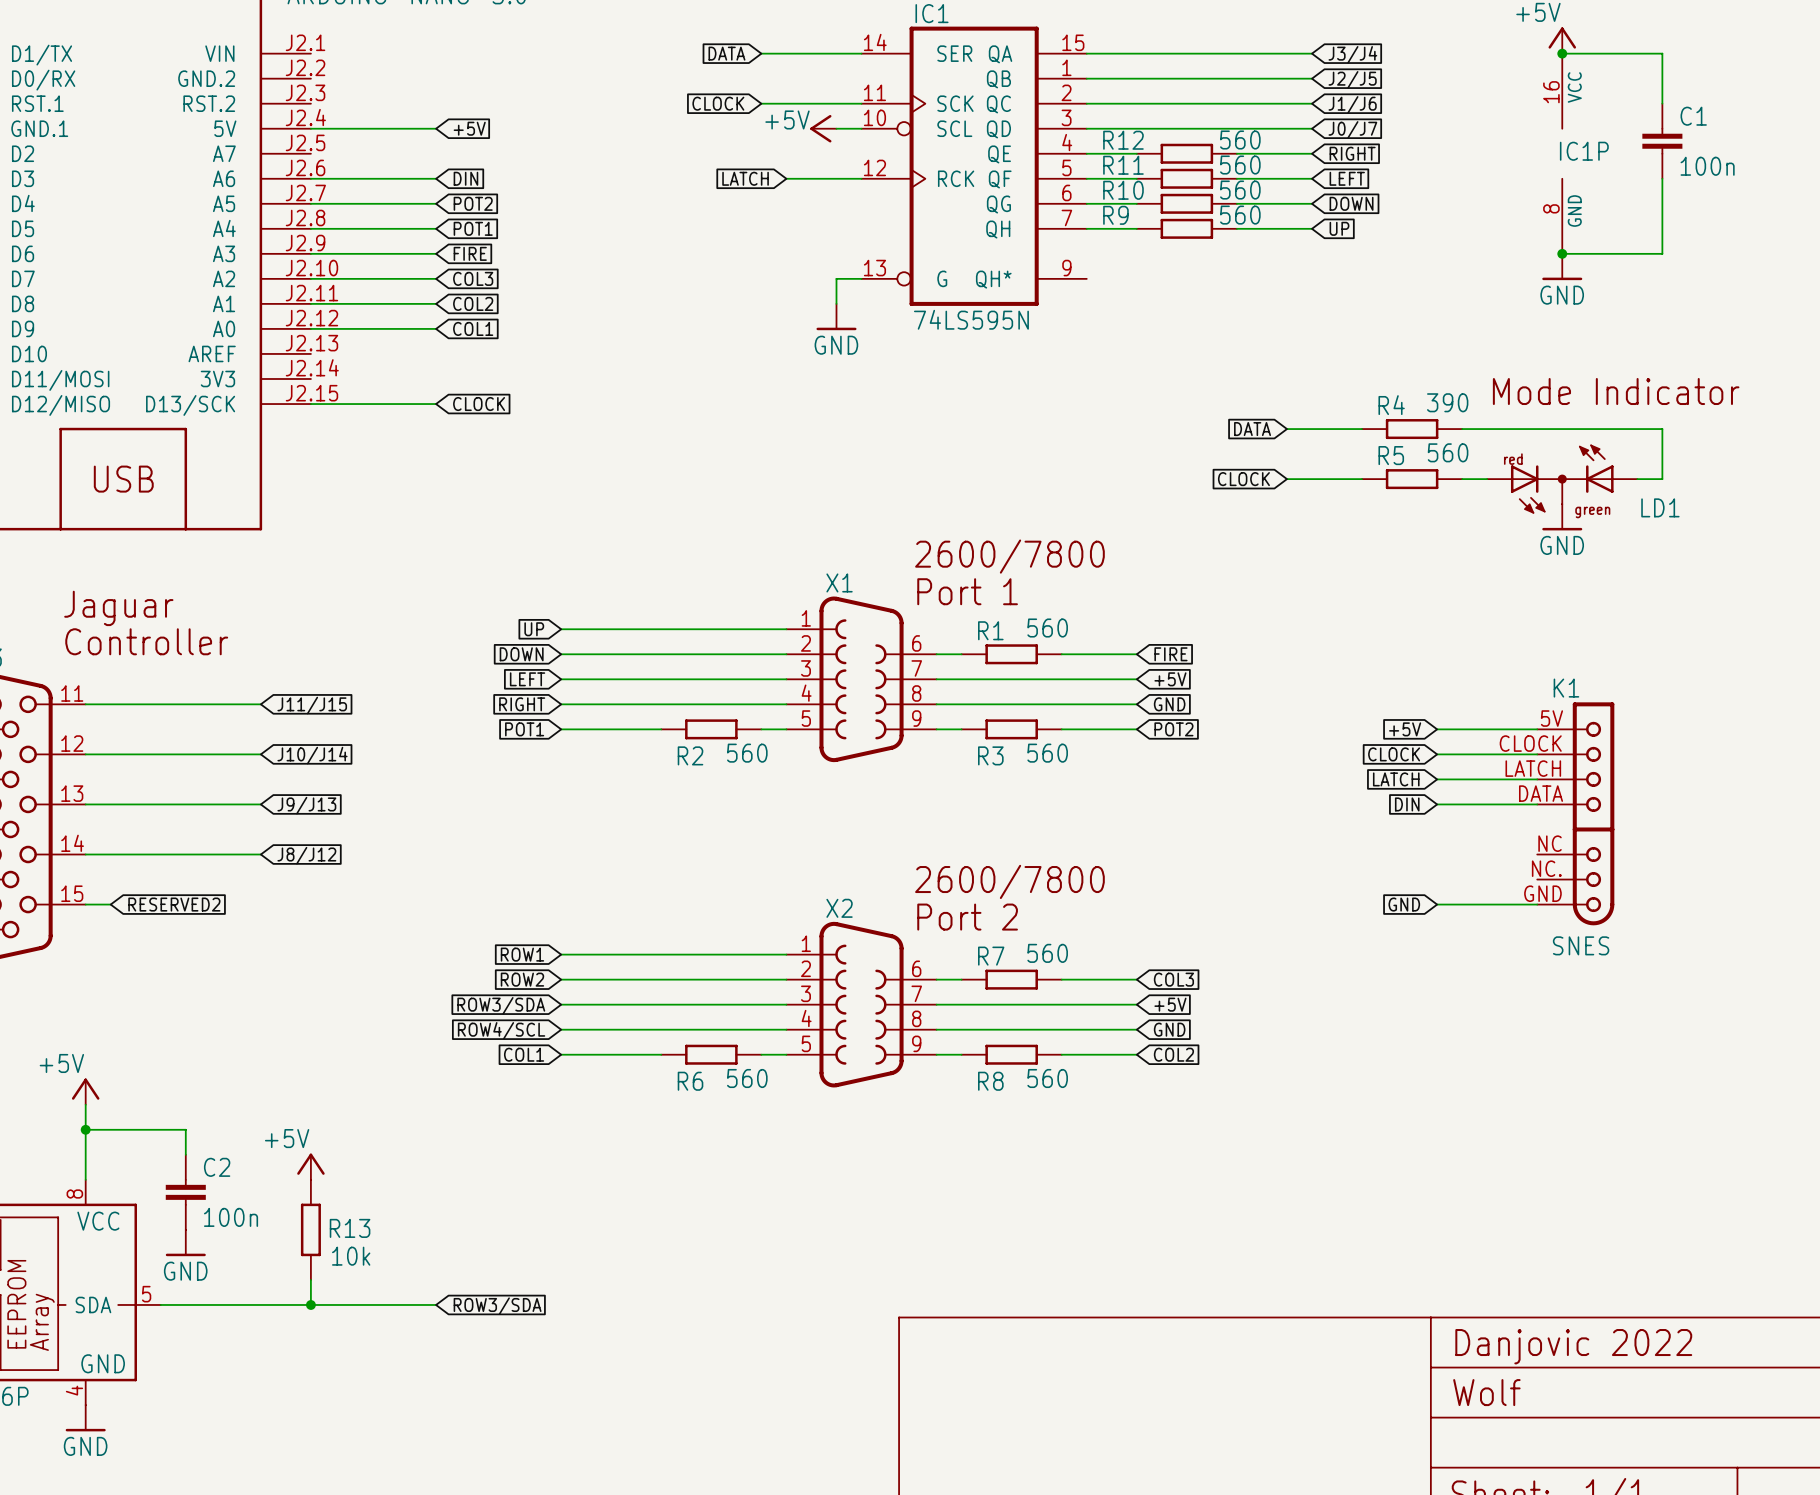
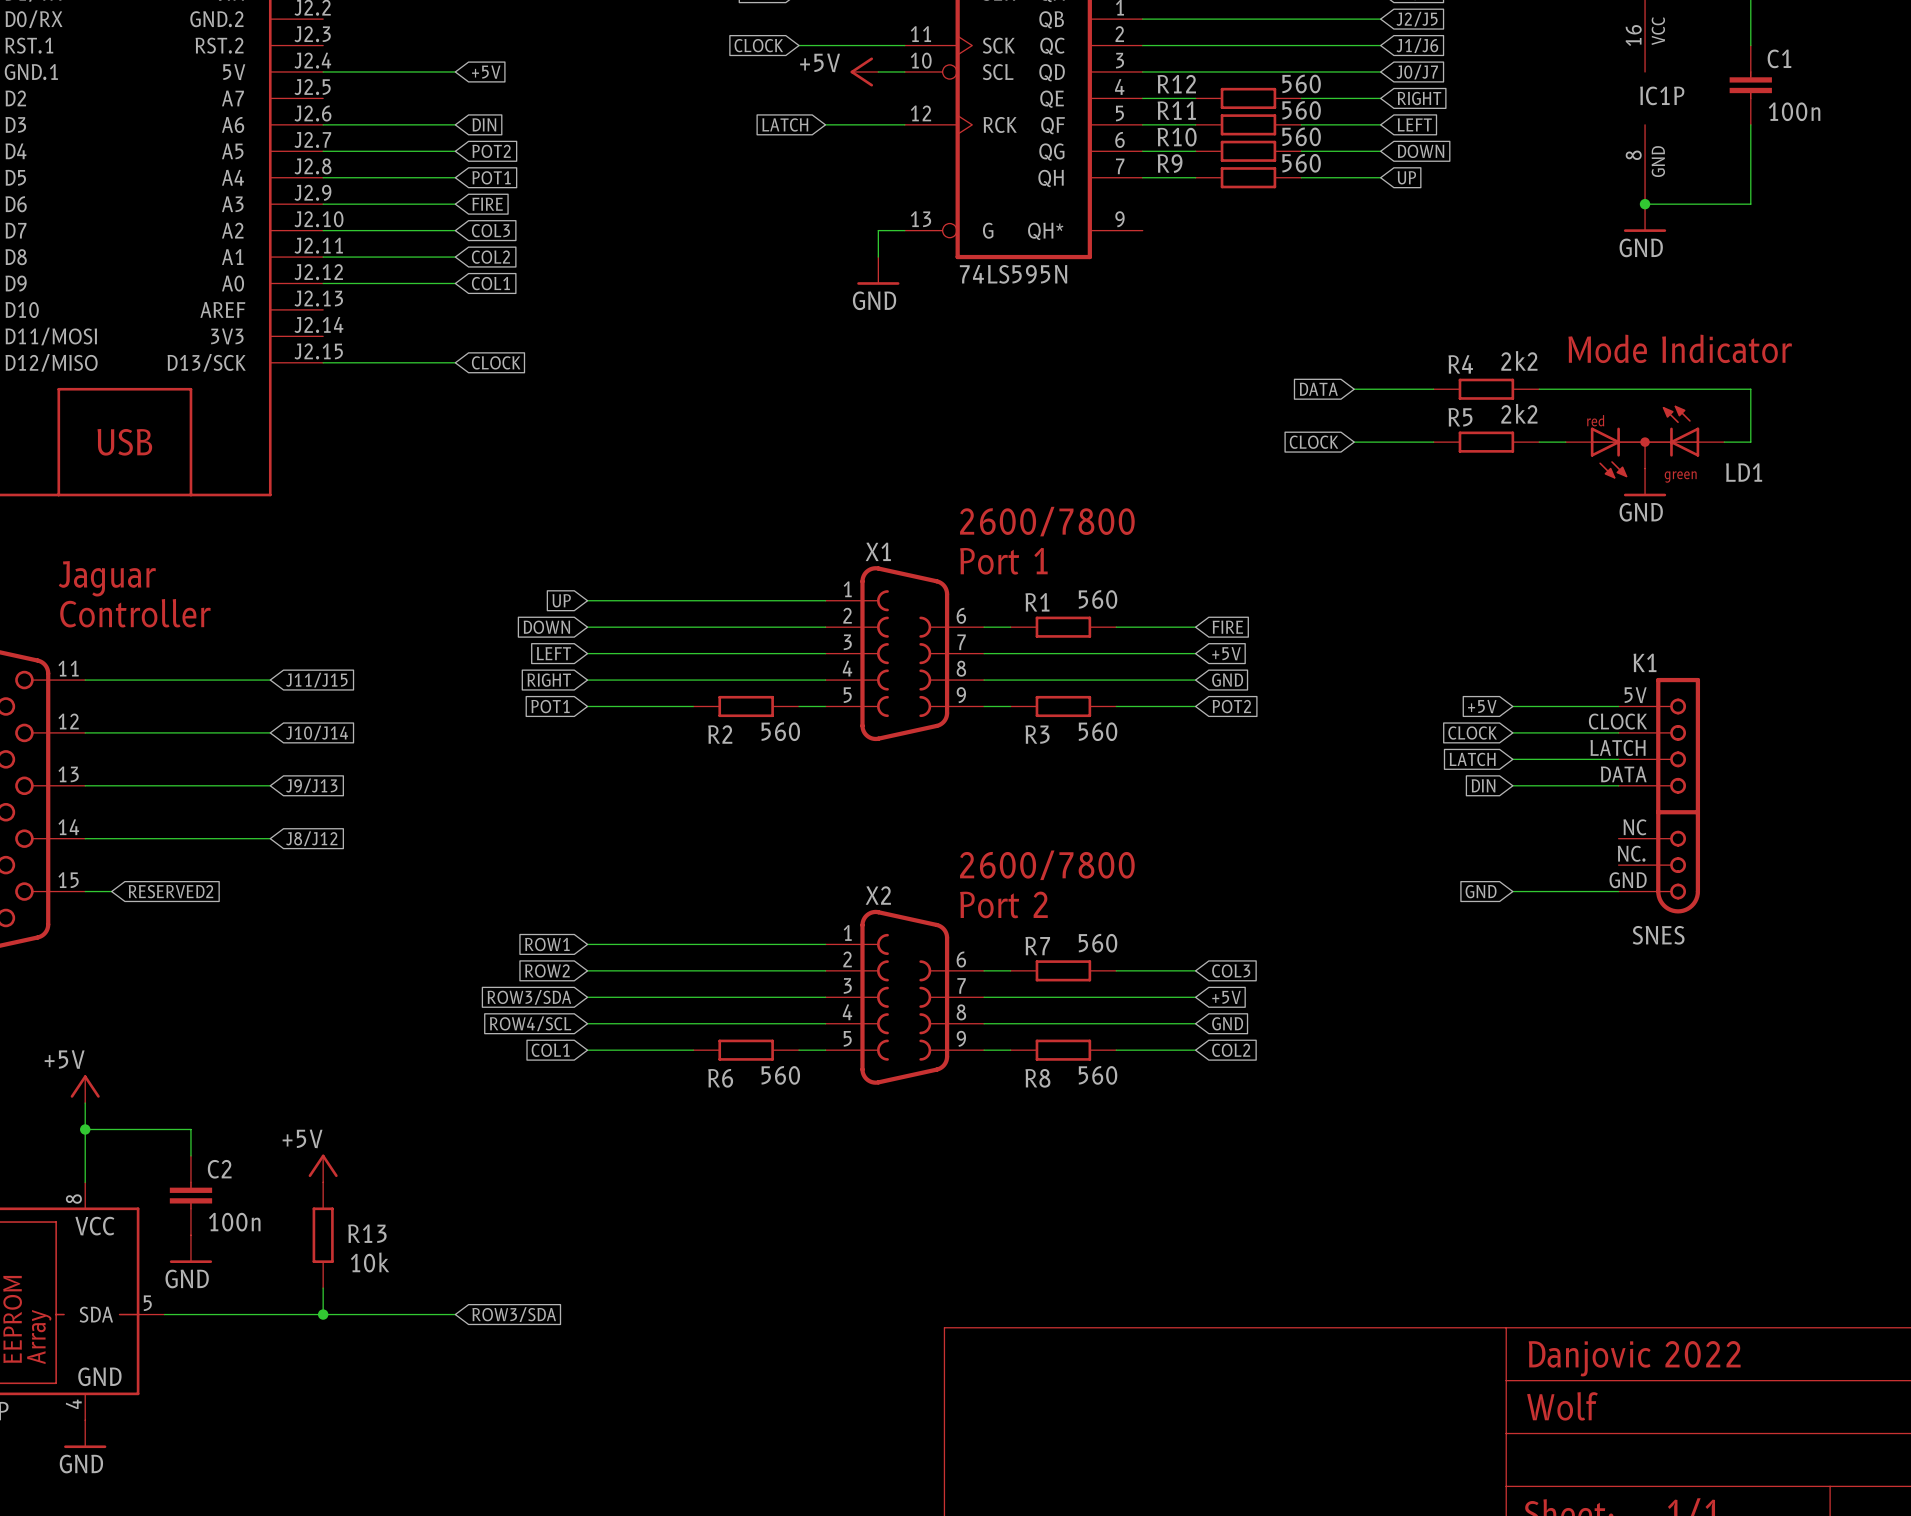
R4 value: 390 (1447, 402) -> 2k2 (1519, 360)
R5 value: 560 (1448, 452) -> 2k2 (1519, 413)

